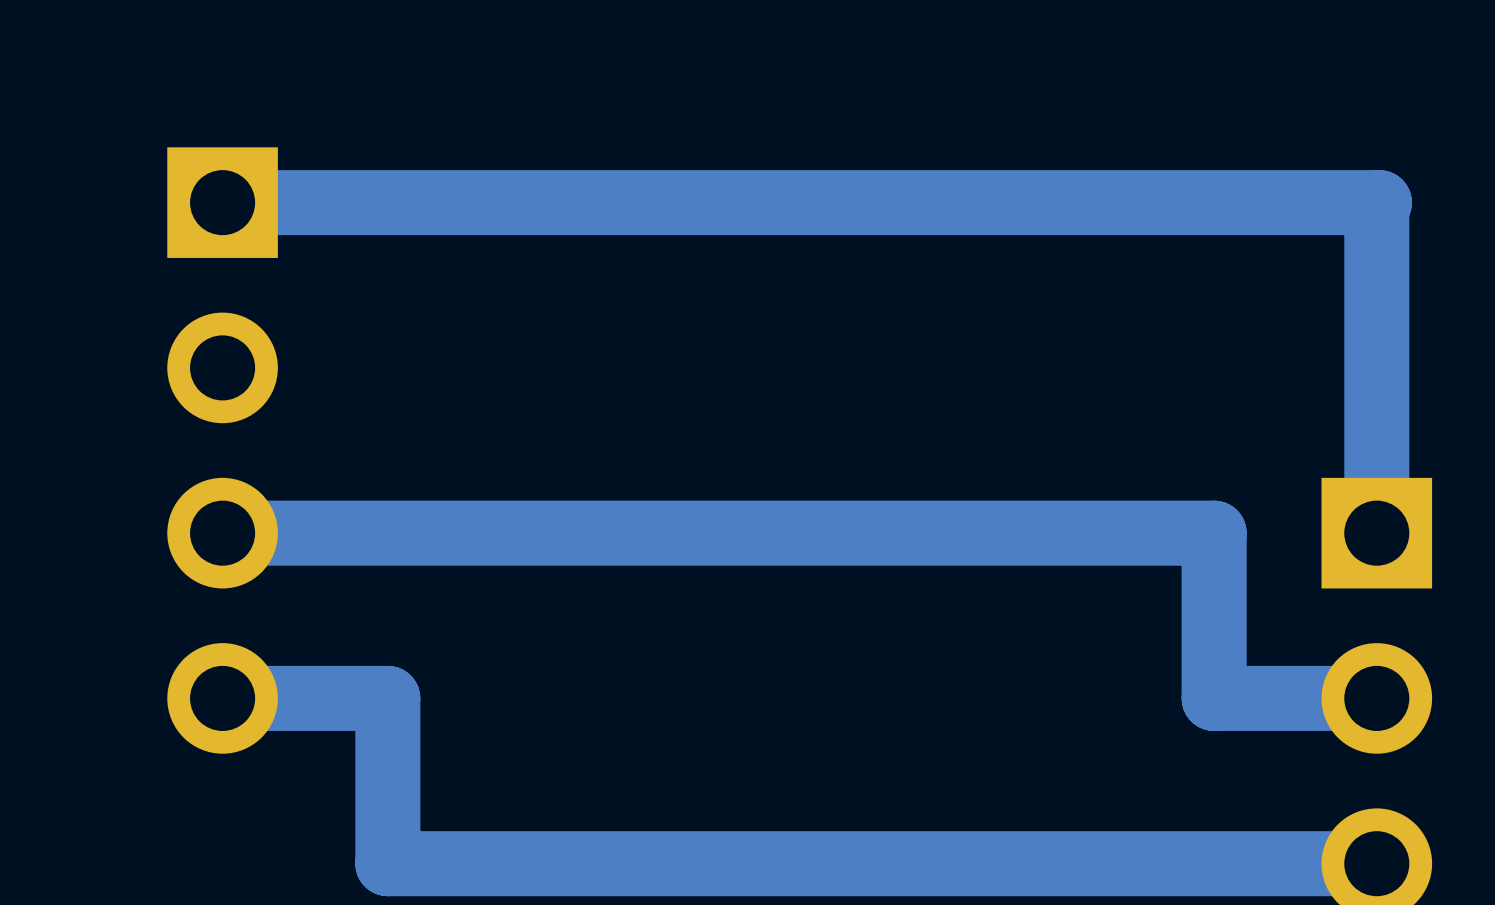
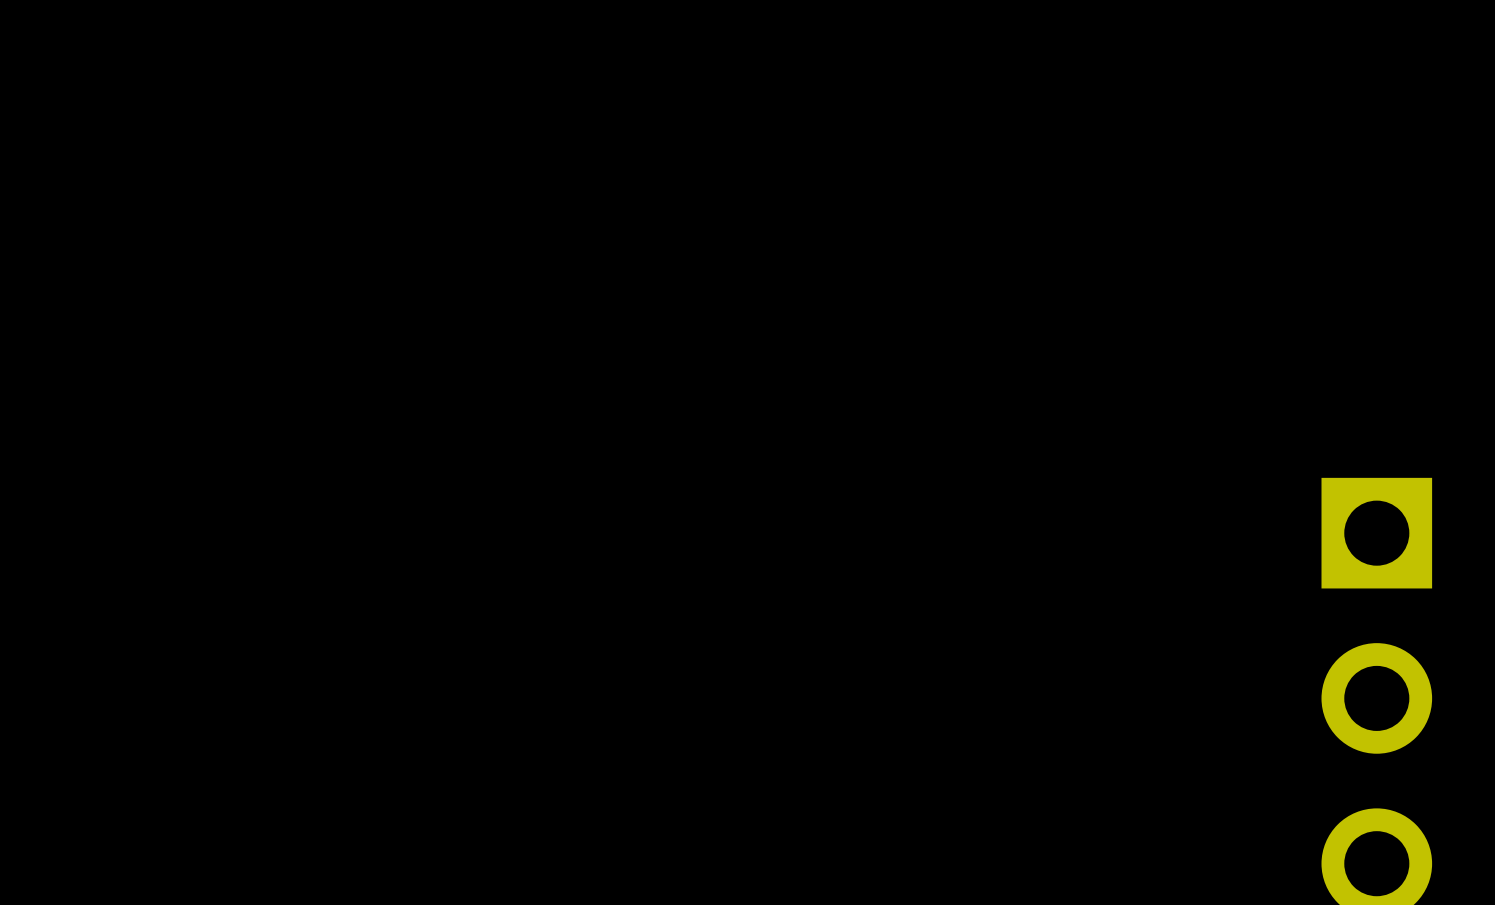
bottom track: (222, 202) (1379, 202) (1376, 205) (1376, 533) -> none
part: (222, 450) -> none
bottom track: (222, 533) (1214, 533) (1214, 698) (1376, 698) -> none
bottom track: (222, 698) (387, 698) (387, 863) (1376, 863) -> none

